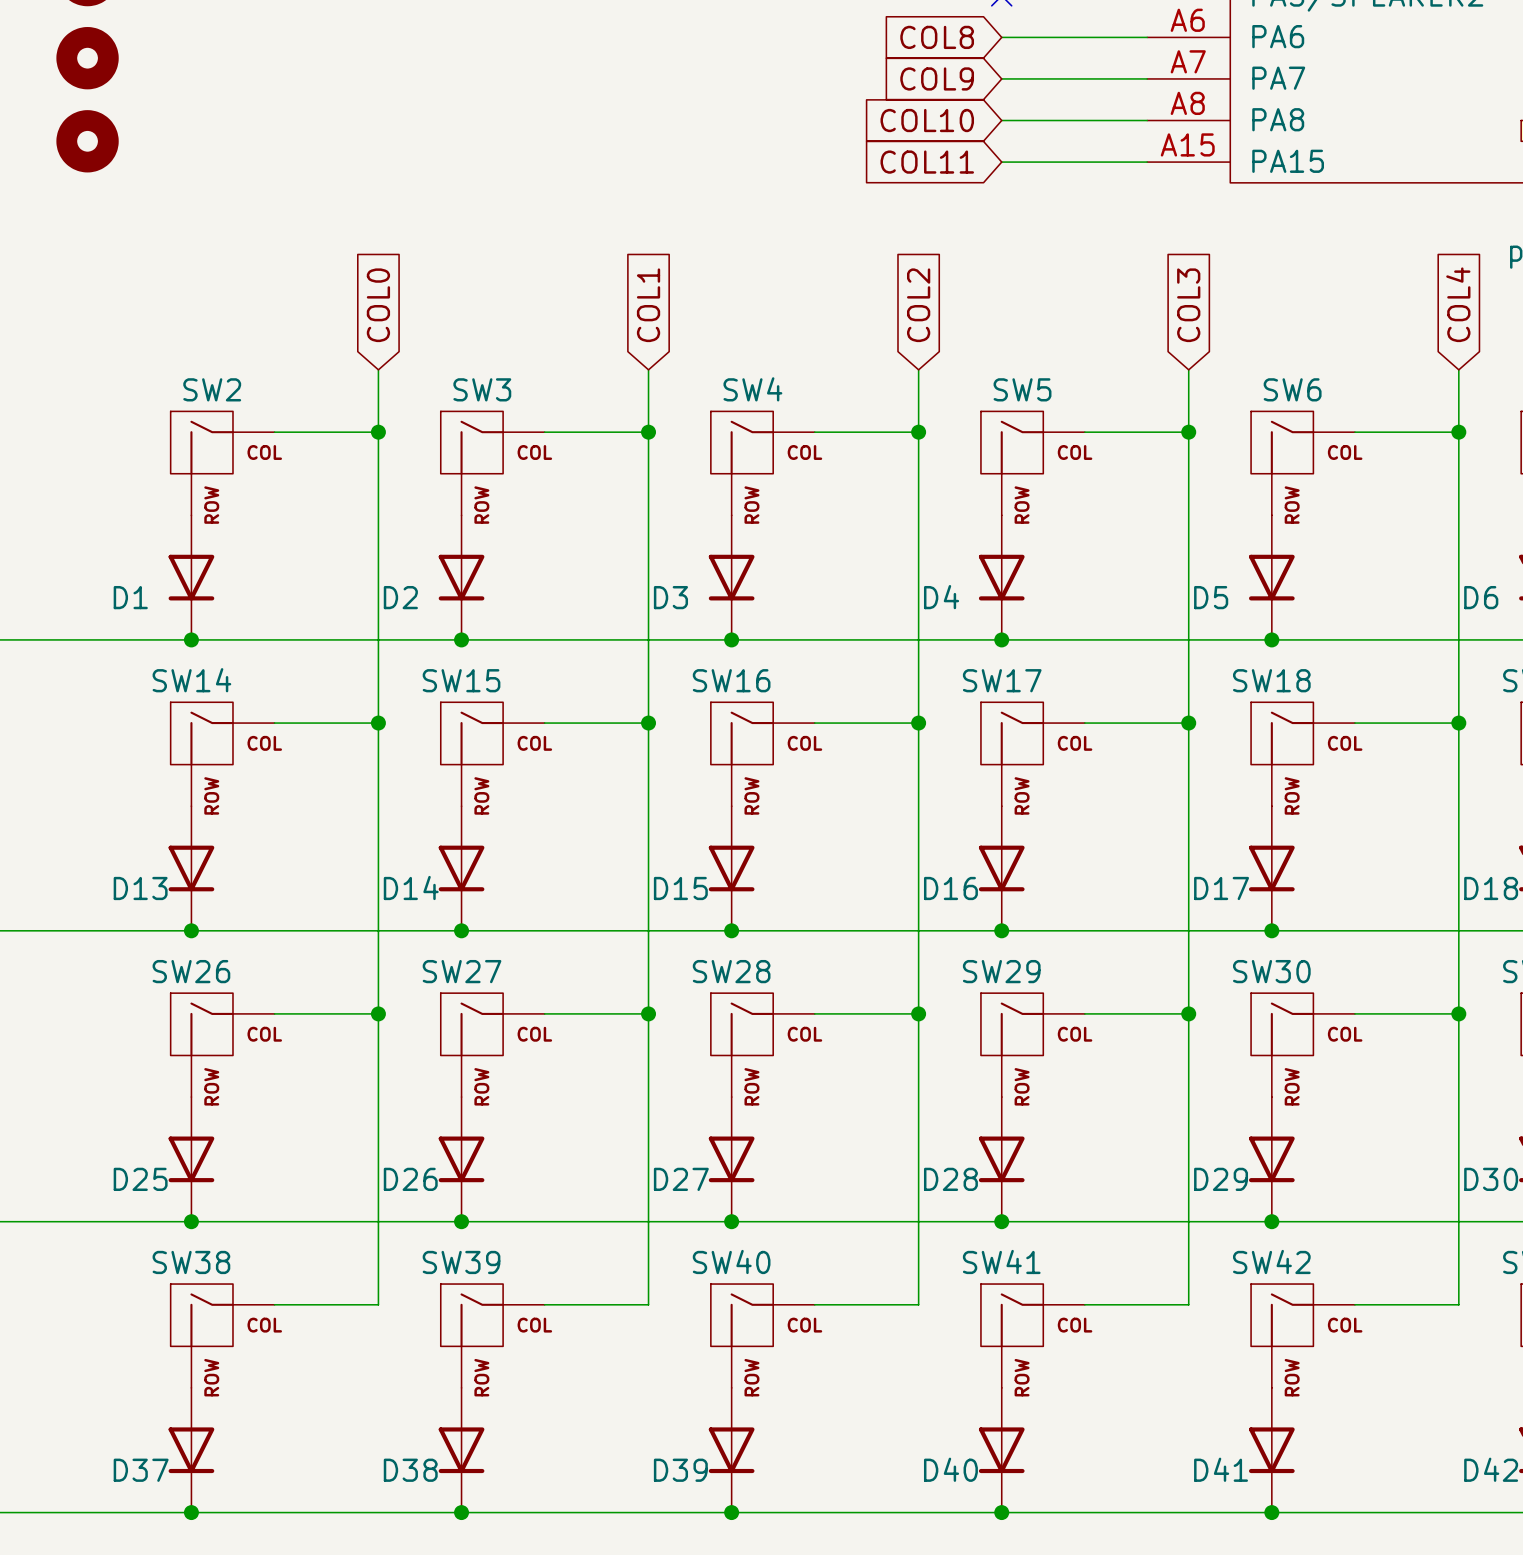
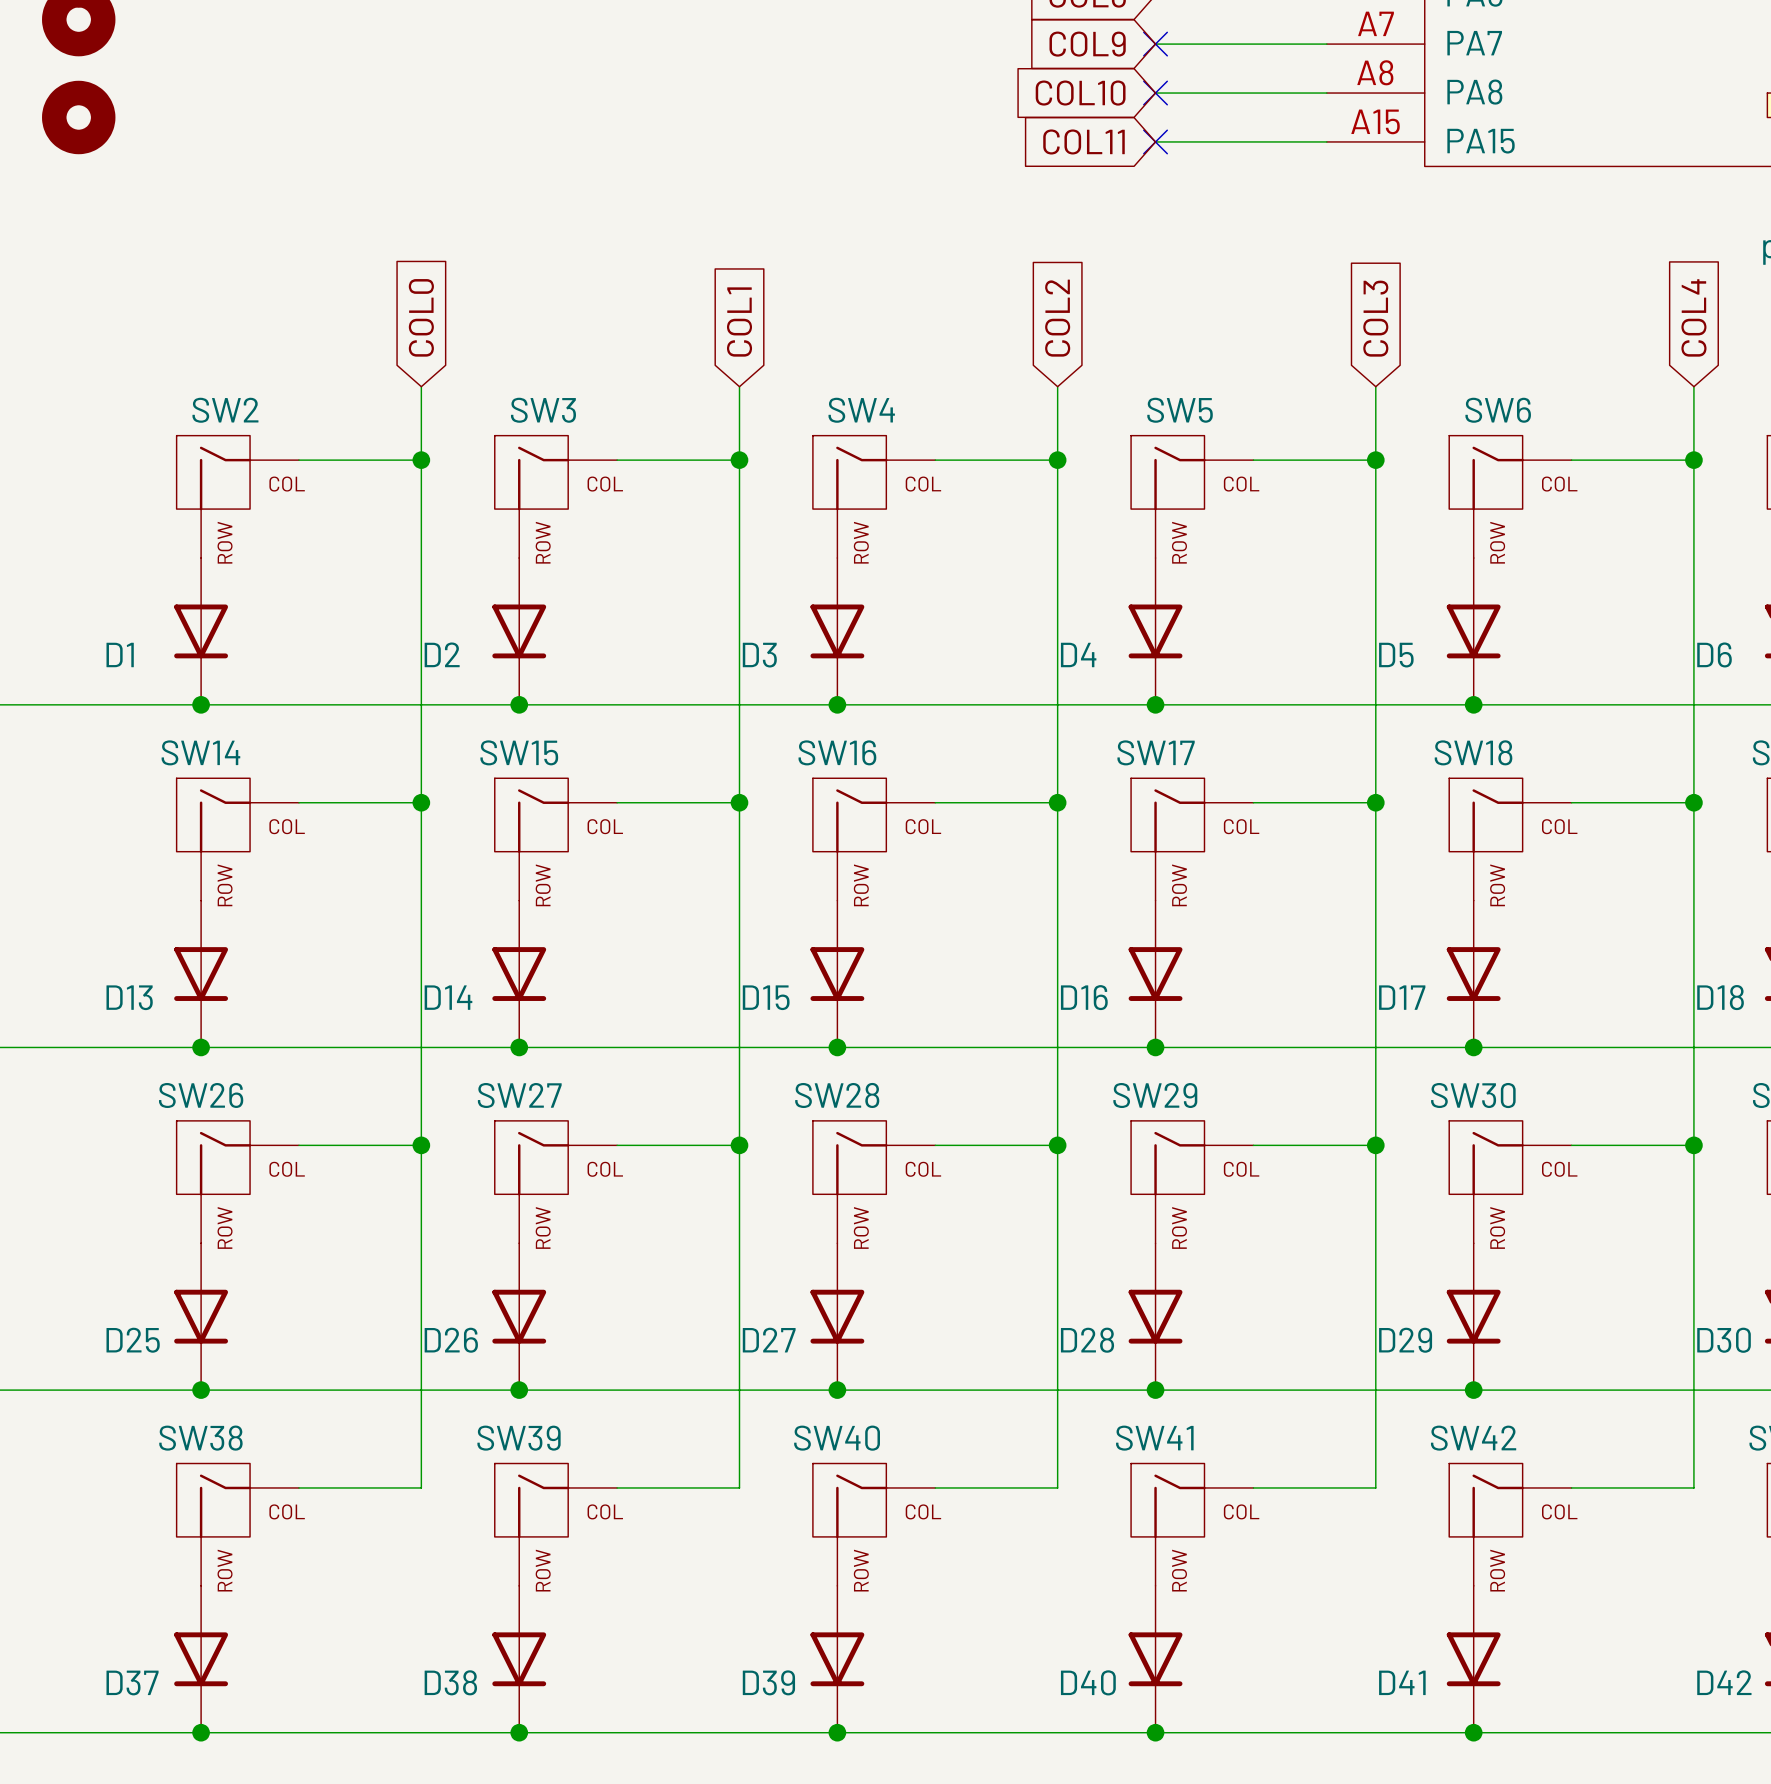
no-connect mark: none -> (1155, 44)
no-connect mark: none -> (1155, 93)
no-connect mark: none -> (1155, 141)

